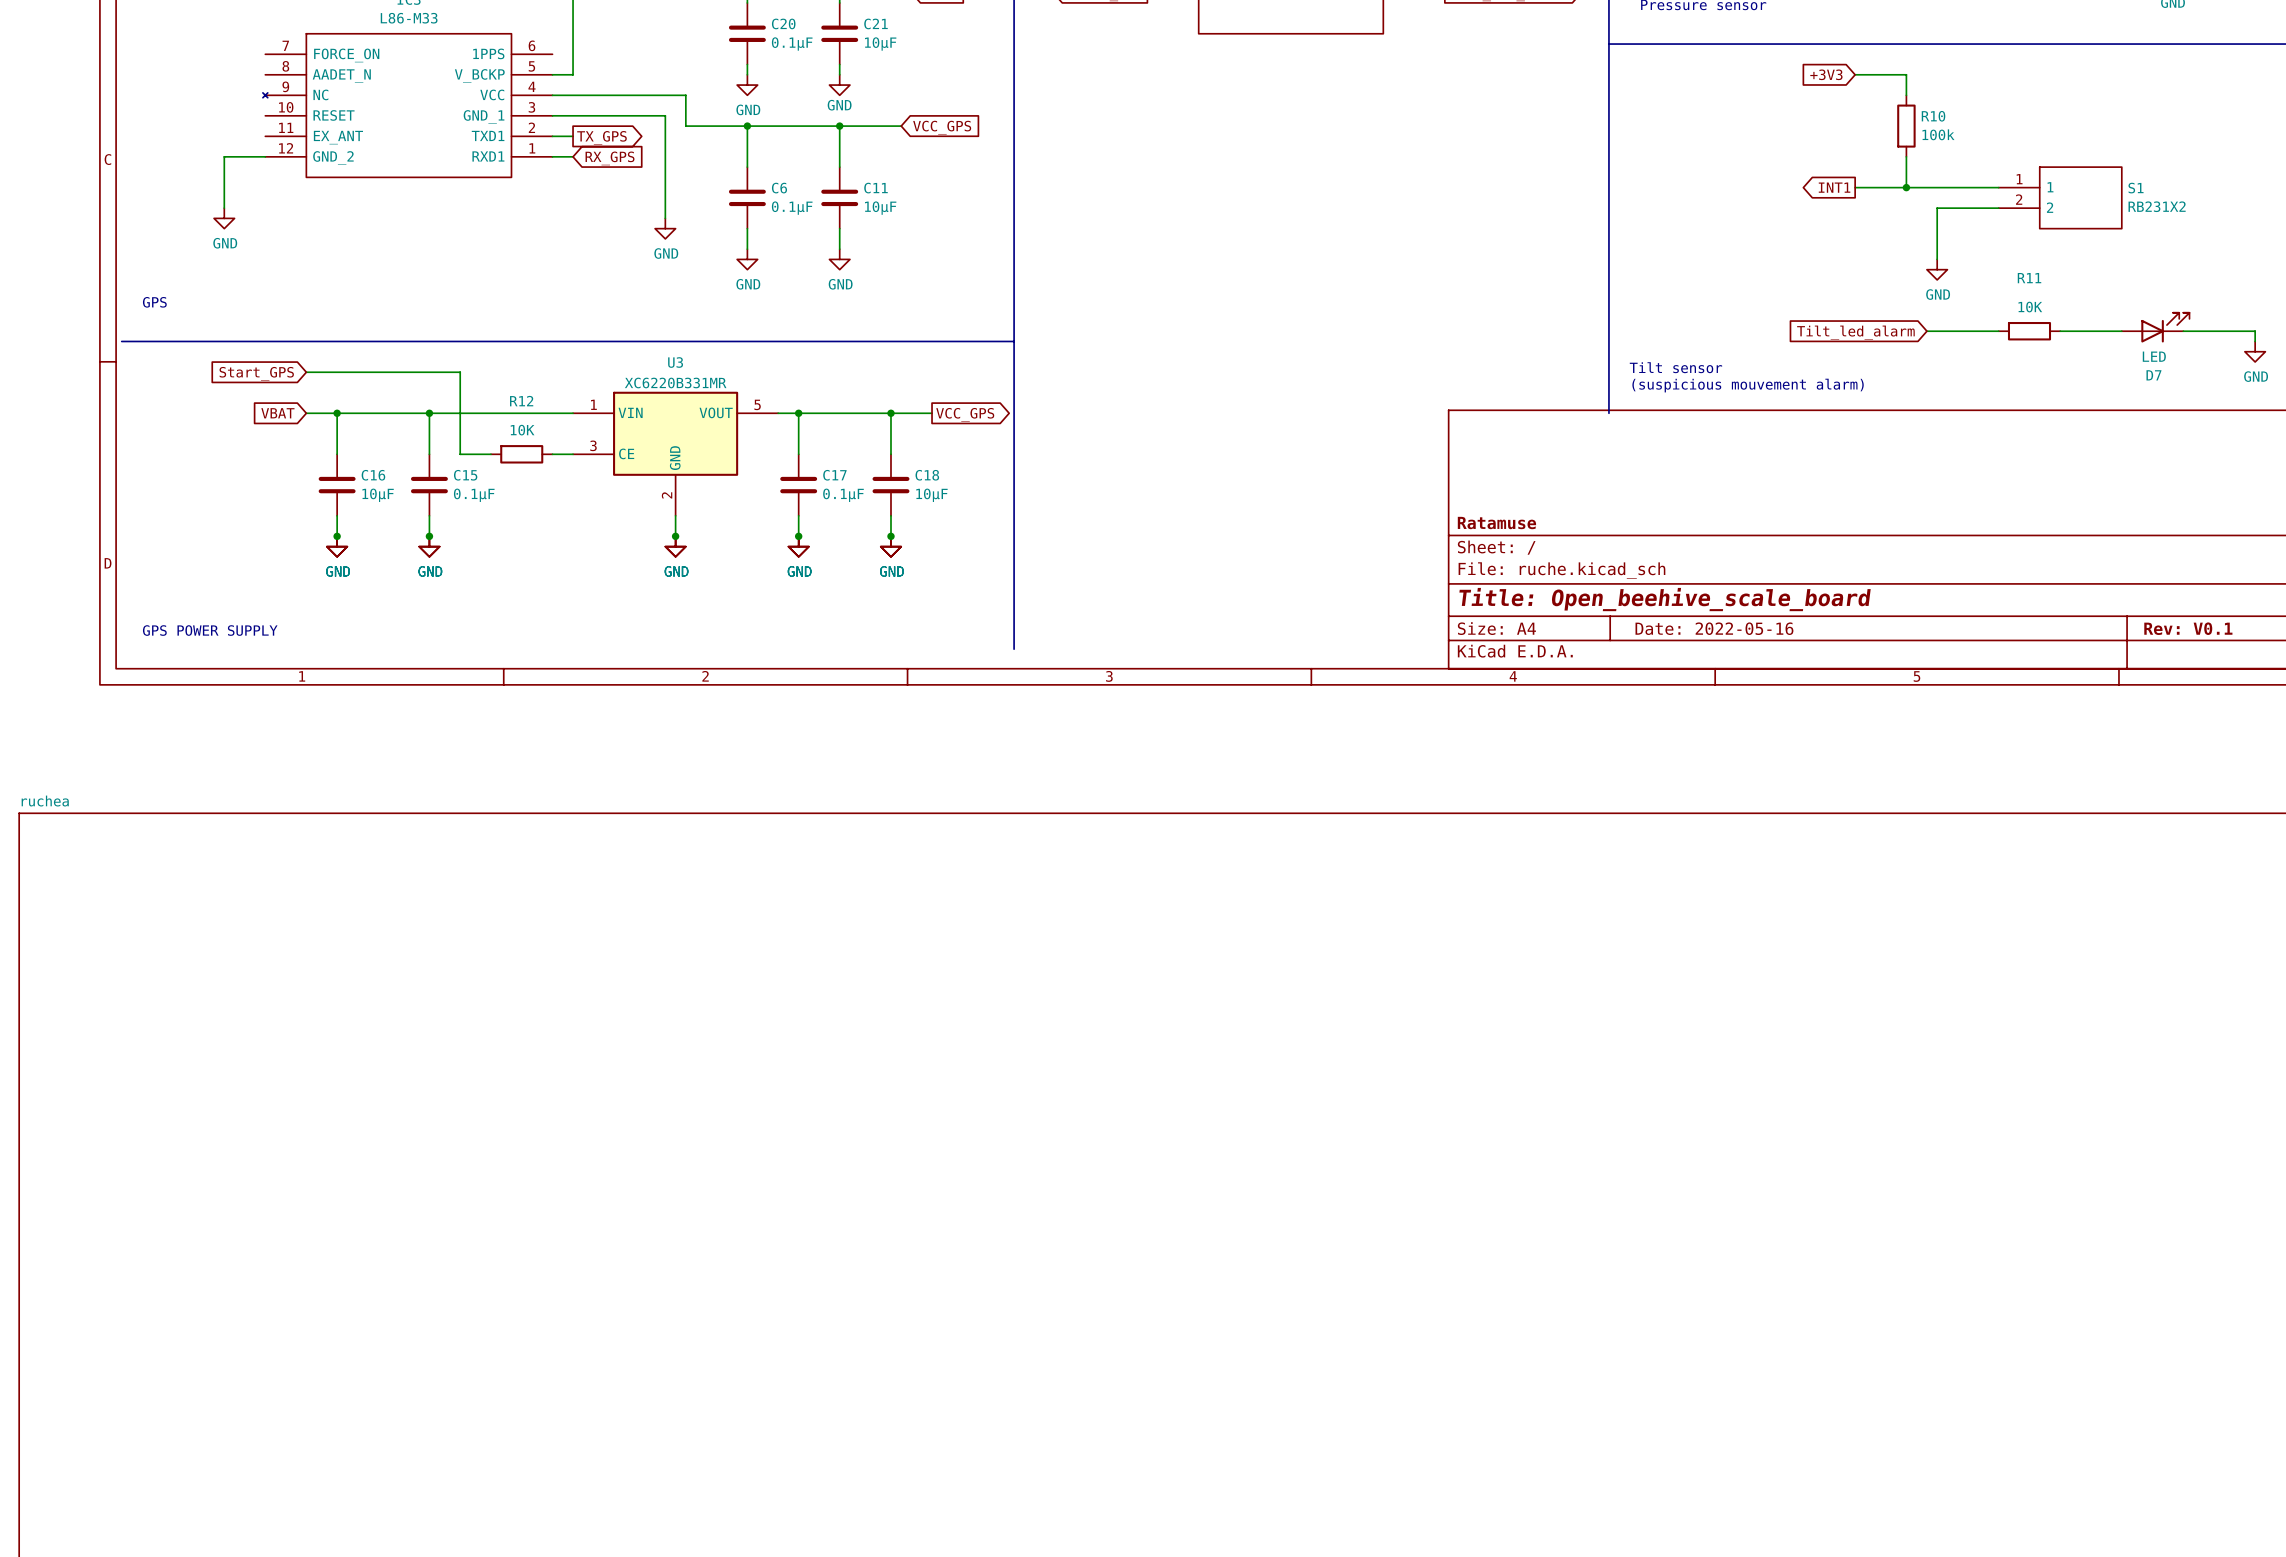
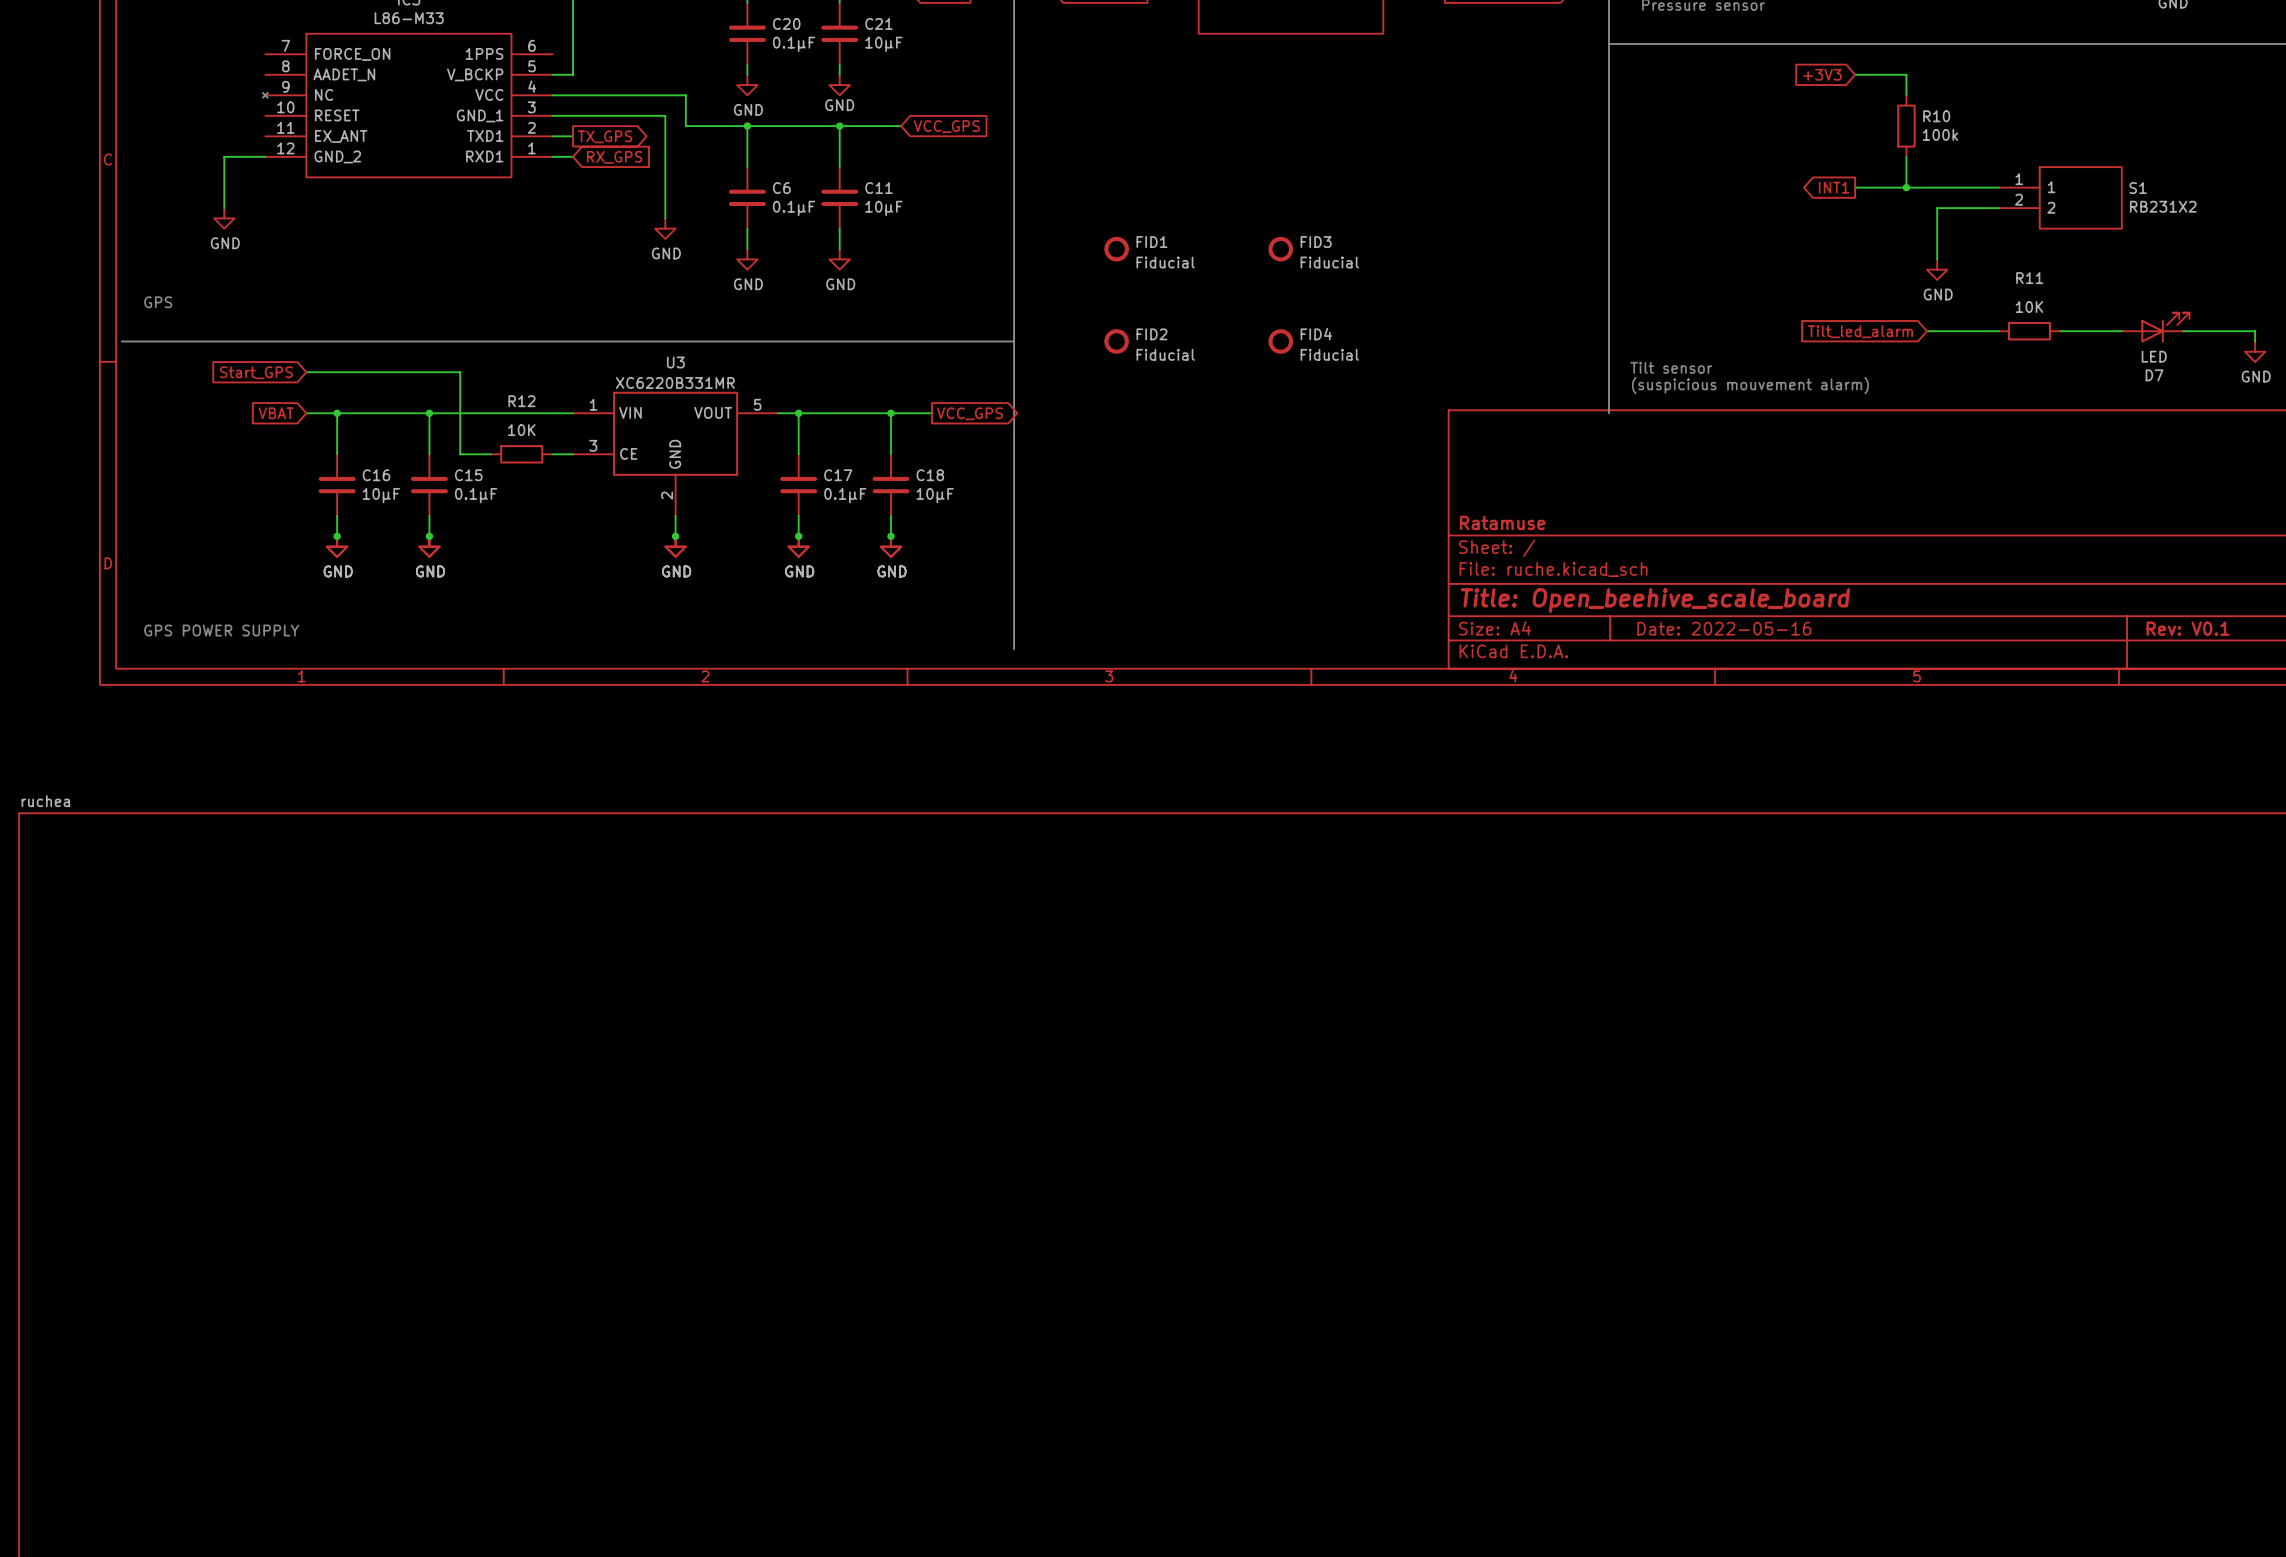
FID1: none -> Fiducial (1116, 249)
FID3: none -> Fiducial (1280, 249)
FID2: none -> Fiducial (1116, 341)
FID4: none -> Fiducial (1280, 341)

